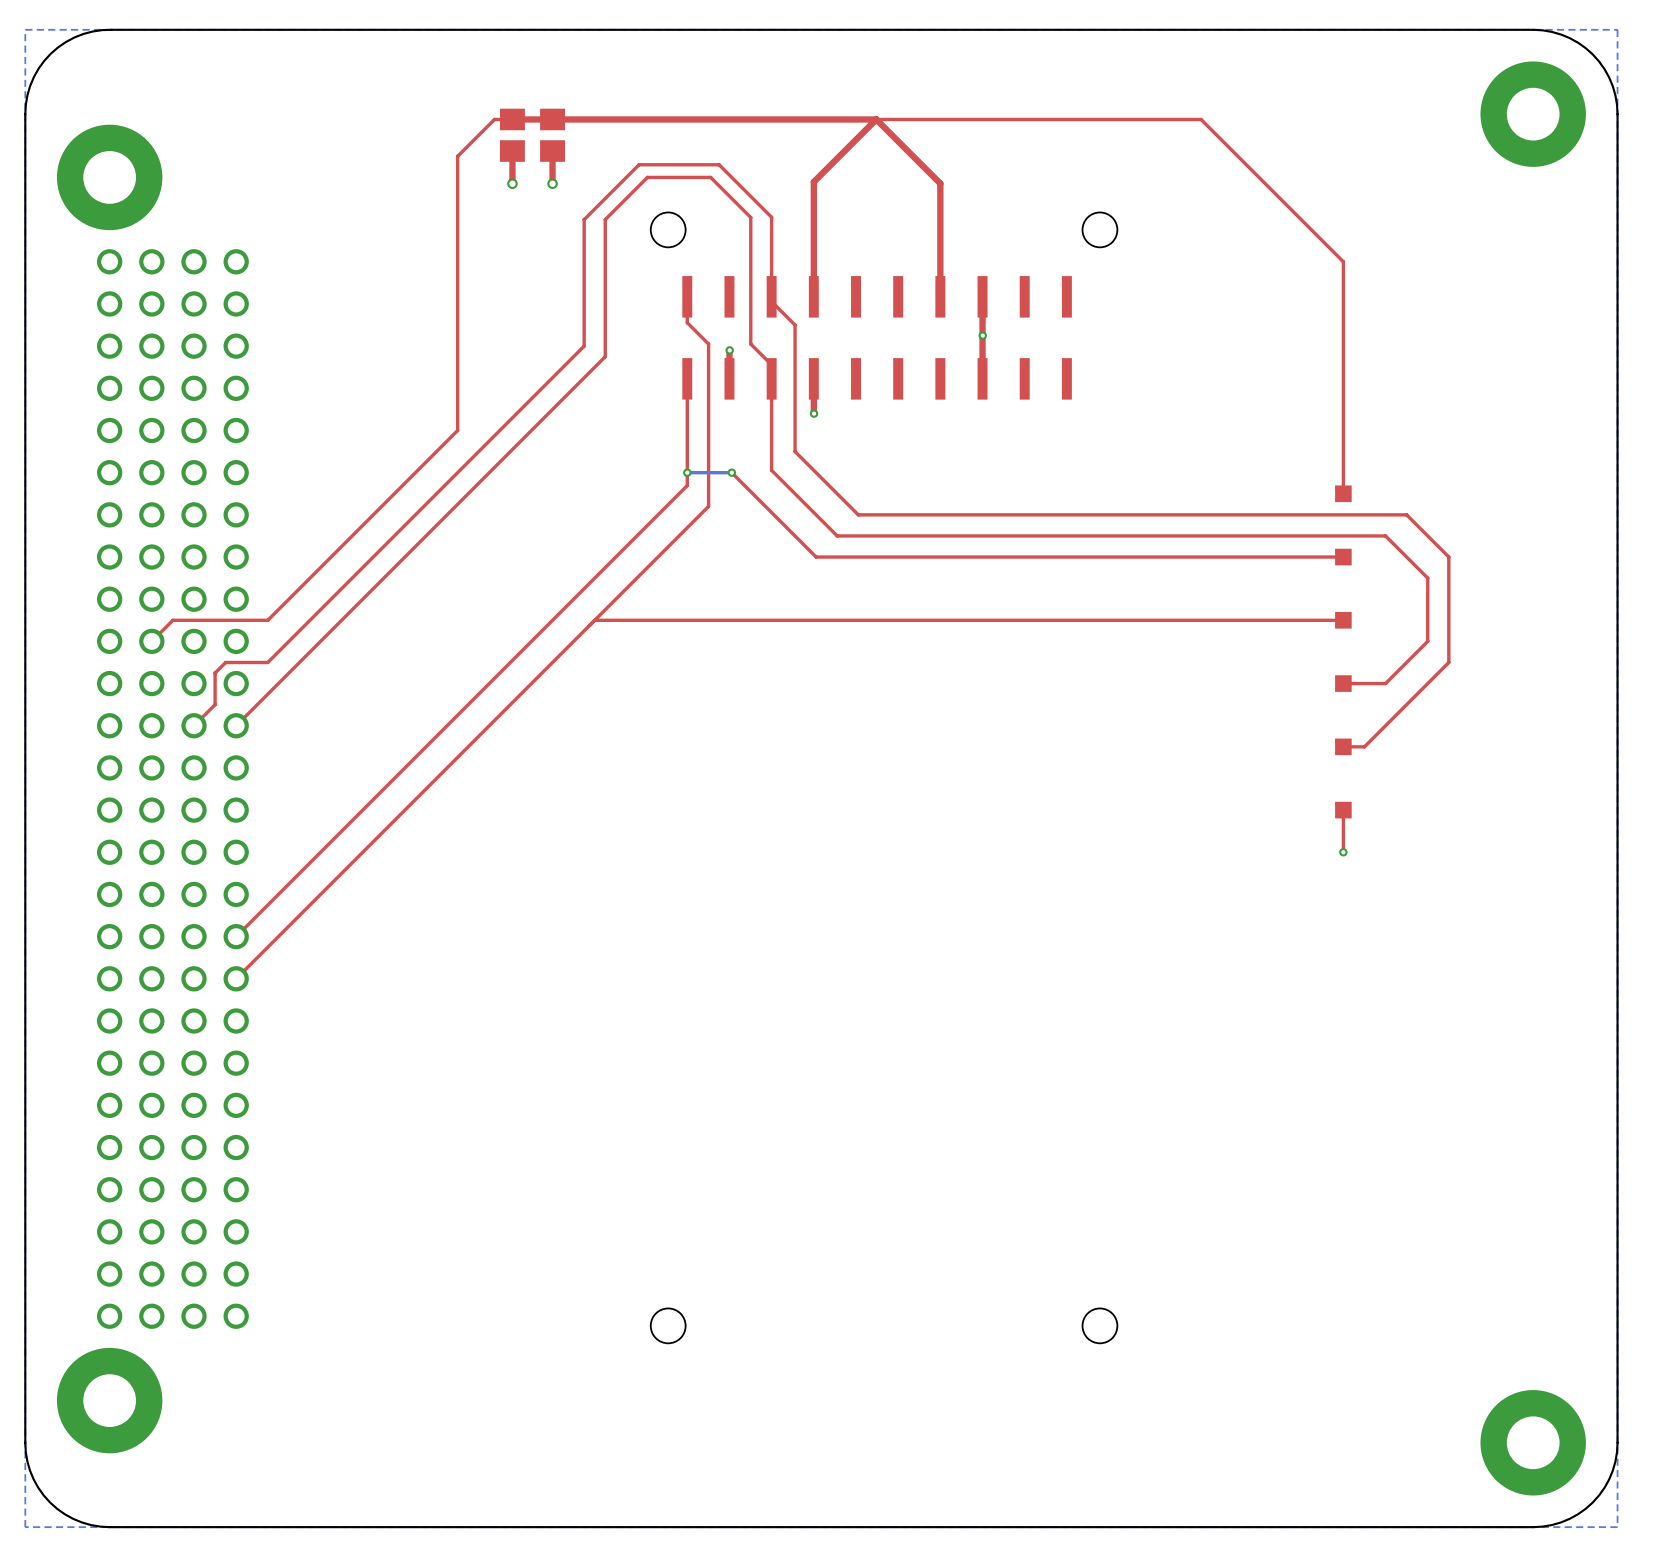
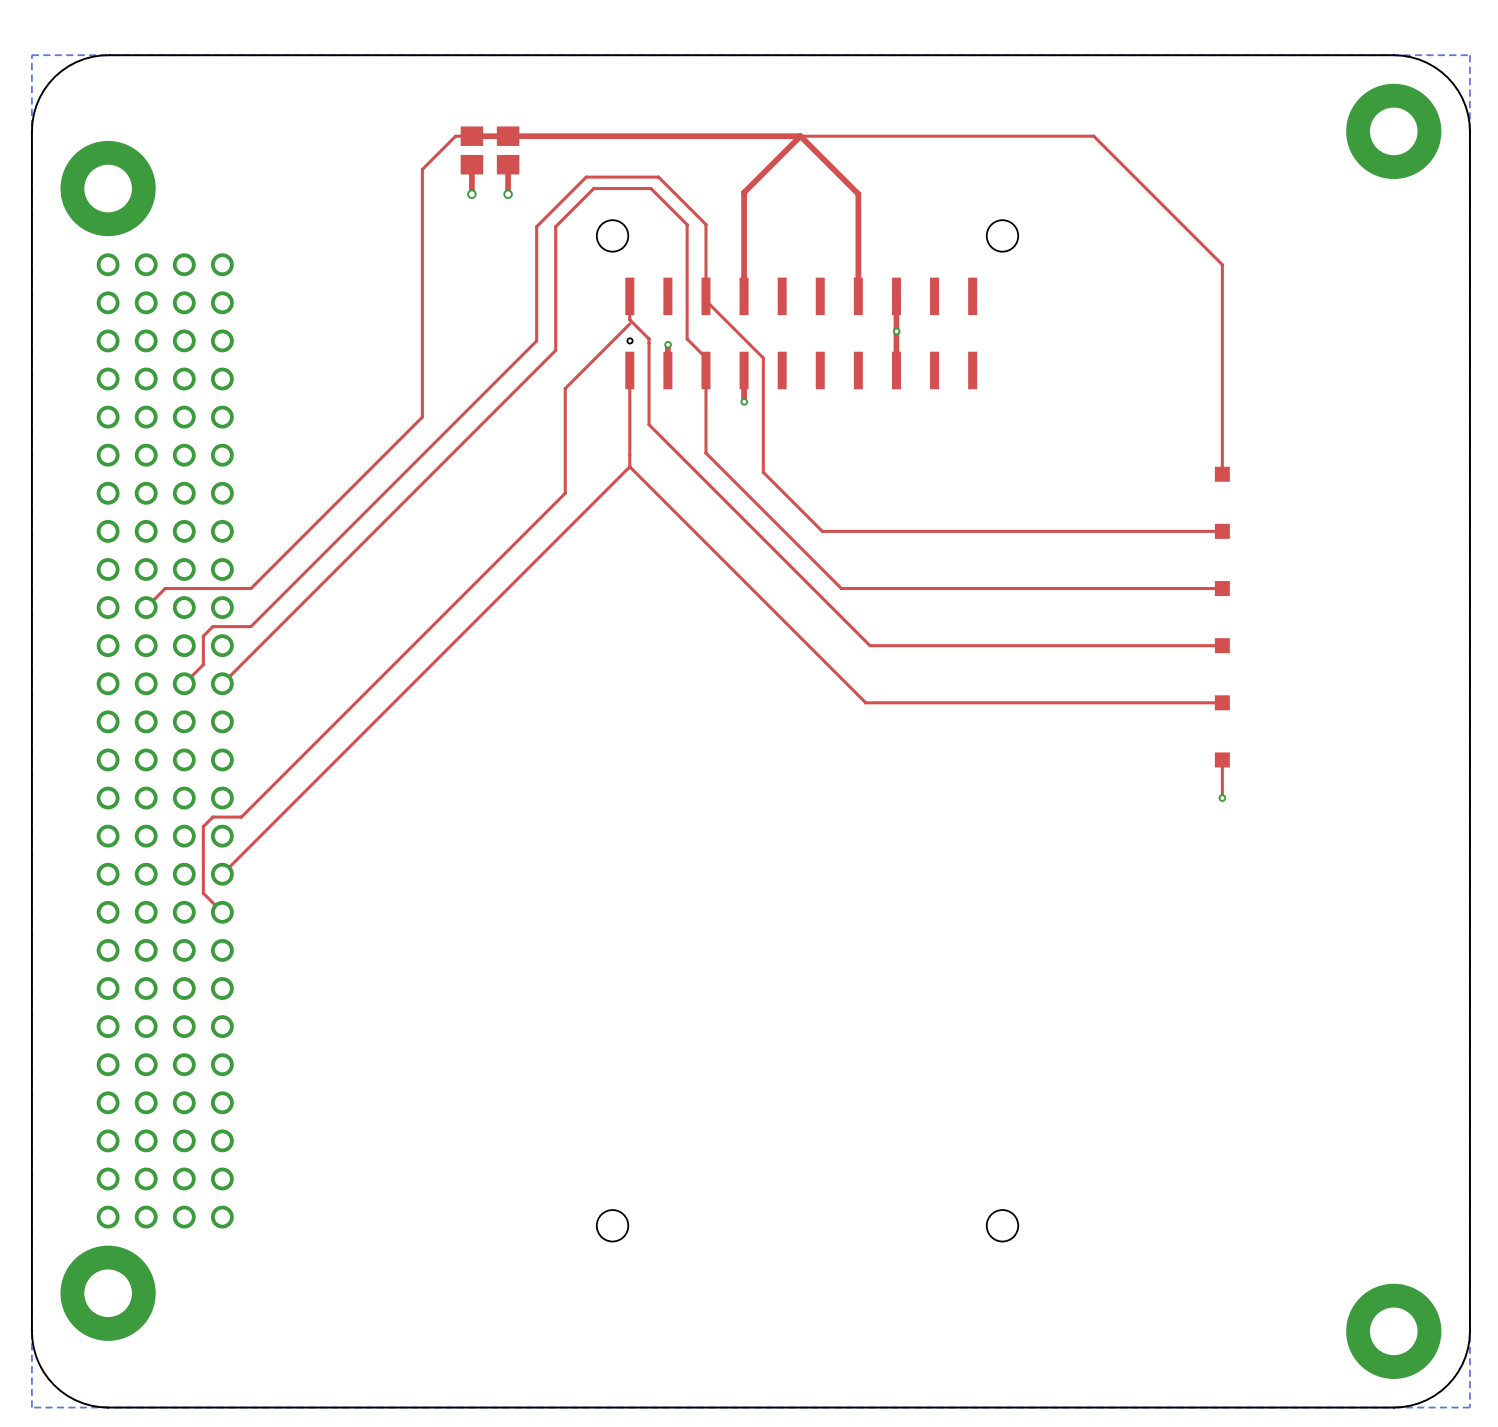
top track: (795, 325) (795, 451) (835, 491) -> (727, 321) (763, 358) (763, 472)
hole: none -> (629, 340)
top track: (708, 438) (708, 506) (236, 978) -> (629, 323) (565, 388) (565, 493) (241, 817) (212, 817) (203, 826) (203, 893) (222, 912)
via: (687, 472) -> none
top track: (731, 472) (816, 557) (900, 557) -> (784, 493) (822, 531)
bottom track: (731, 472) (687, 472) -> none
via: (731, 472) -> none
top track: (858, 514) (1406, 514) (1448, 557) (1448, 662) (1364, 746) (1343, 746) -> (629, 466) (865, 702) (1222, 702)
top track: (837, 535) (1385, 535) (1427, 578) (1427, 641) (1385, 683) (1343, 683) -> (649, 424) (869, 645) (1222, 645)
top track: (921, 620) (594, 620) -> (841, 588) (765, 512)

